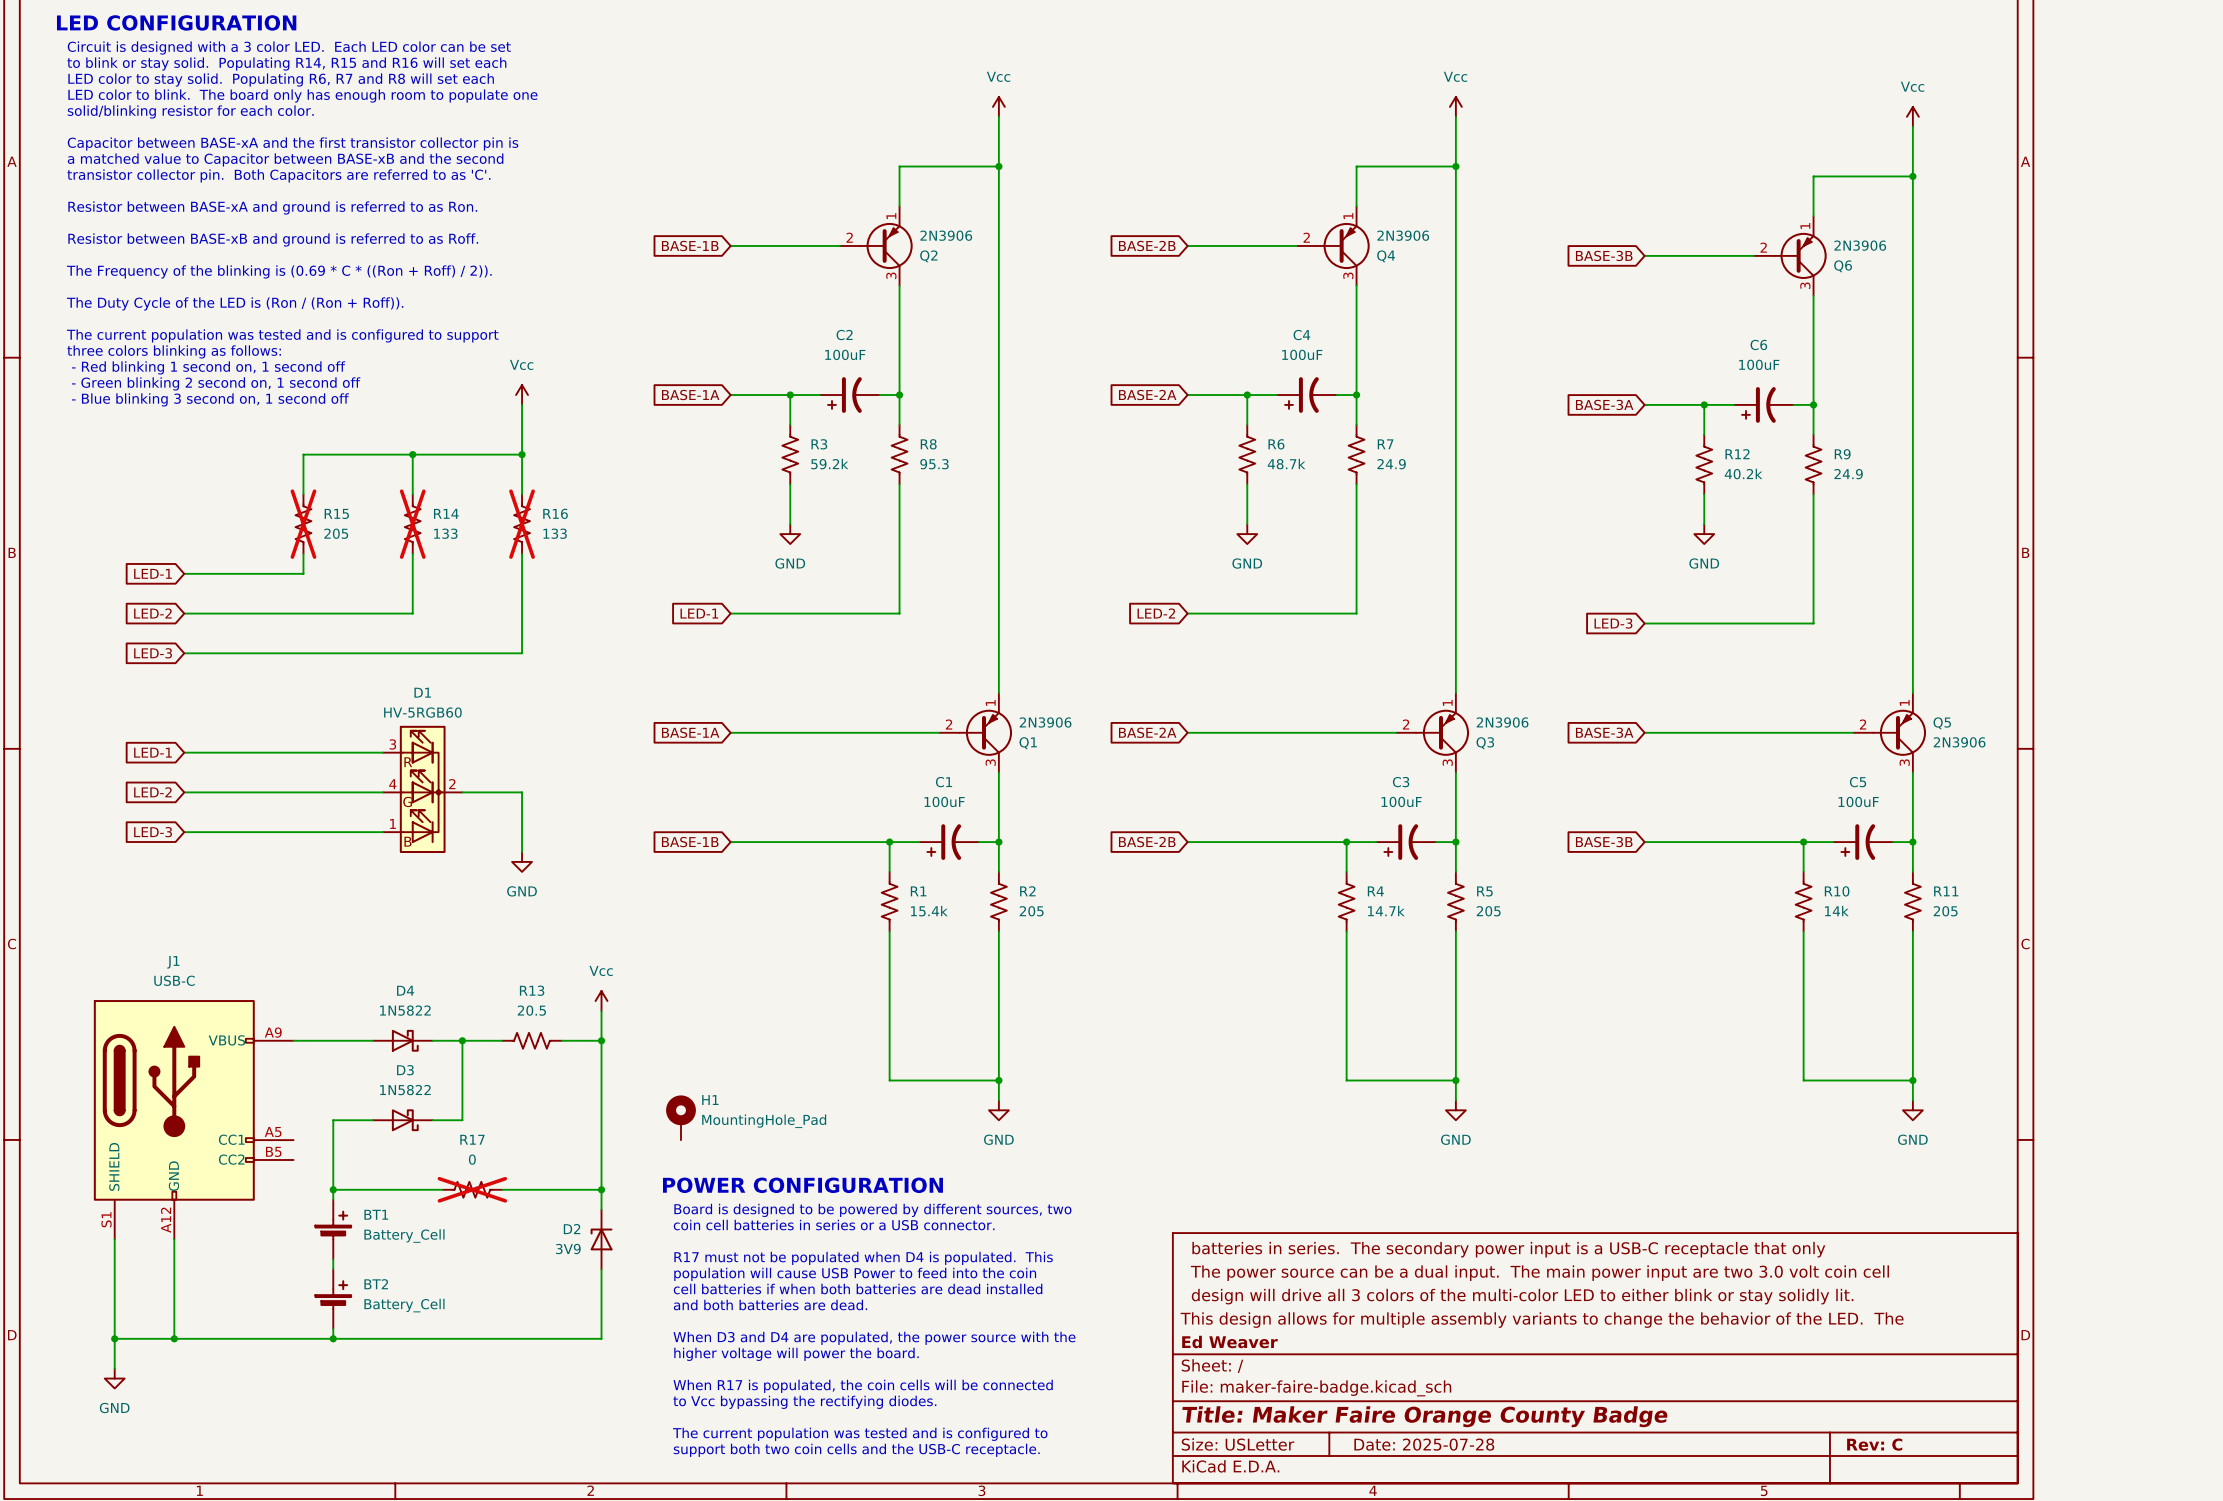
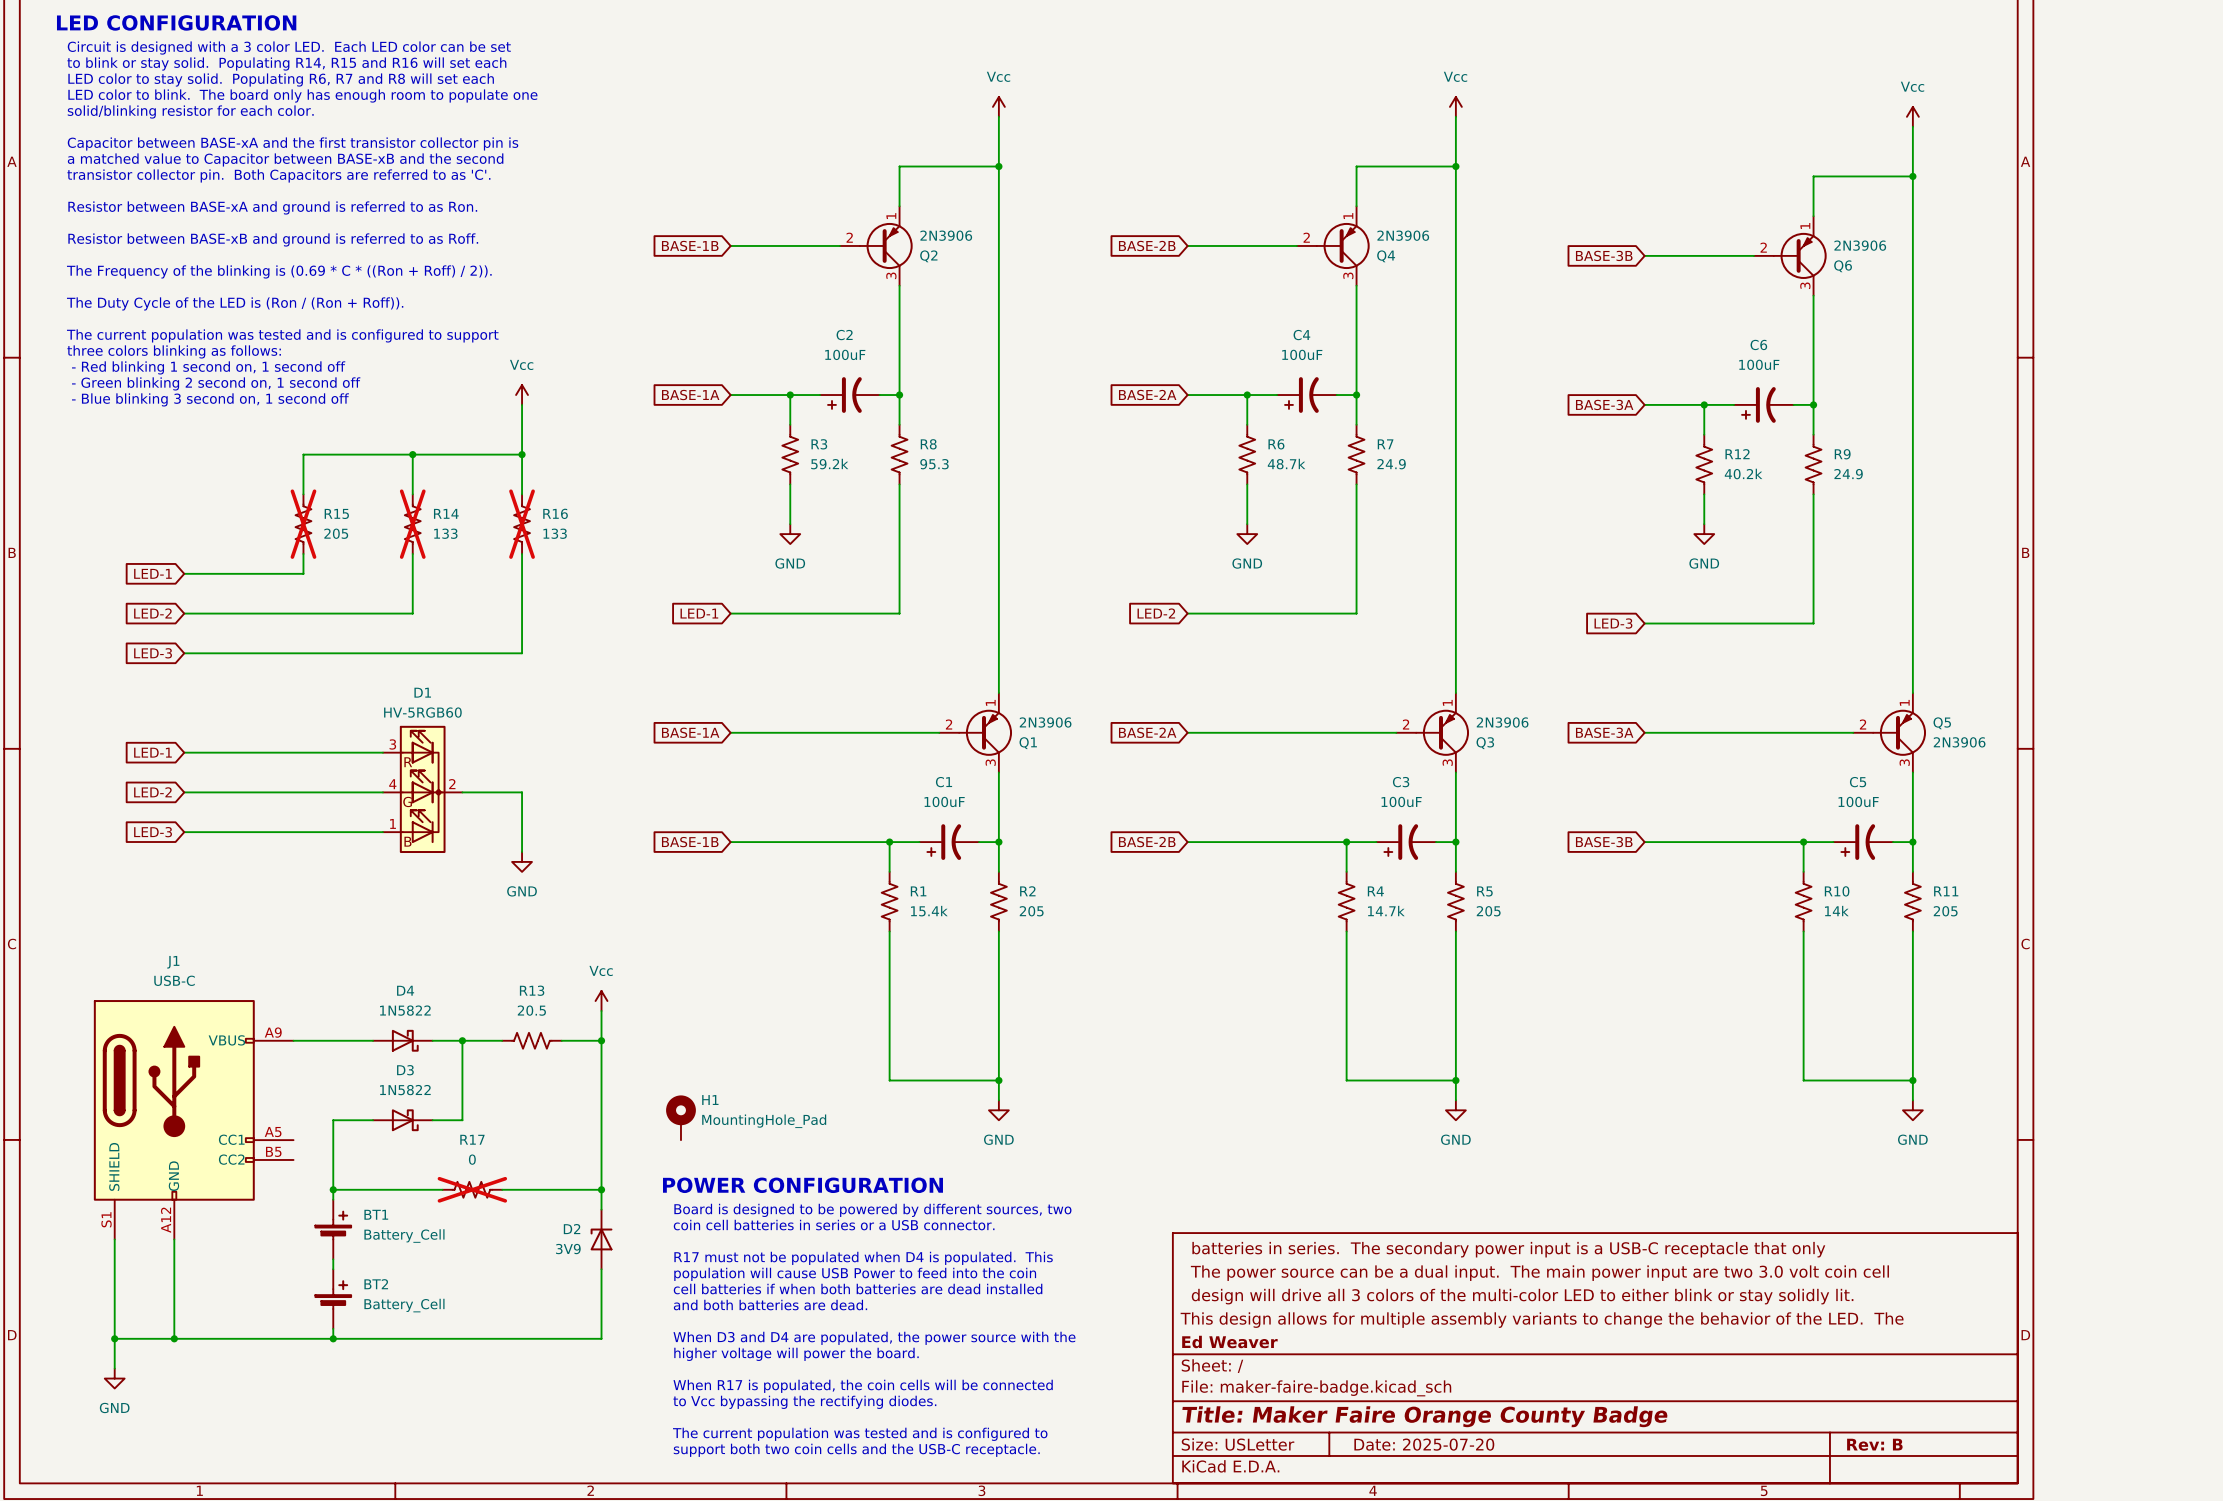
title block: Date: 2025-07-28 (1424, 1444) -> Date: 2025-07-20 (1424, 1444)
title block: Rev: C (1874, 1444) -> Rev: B (1874, 1444)

